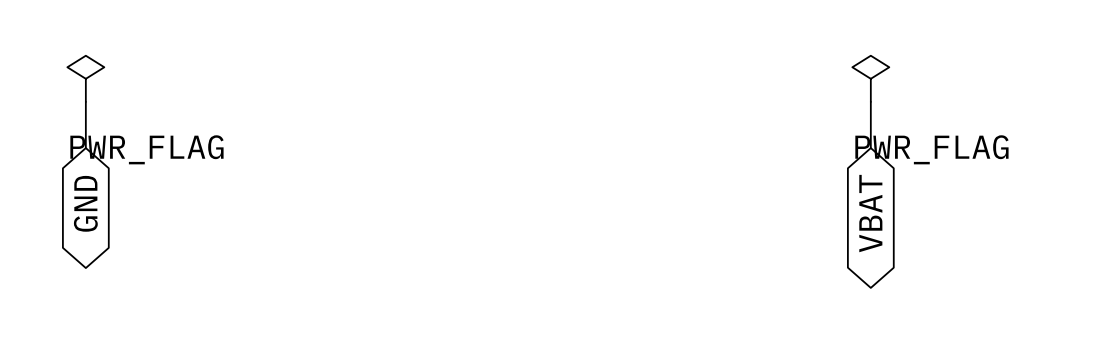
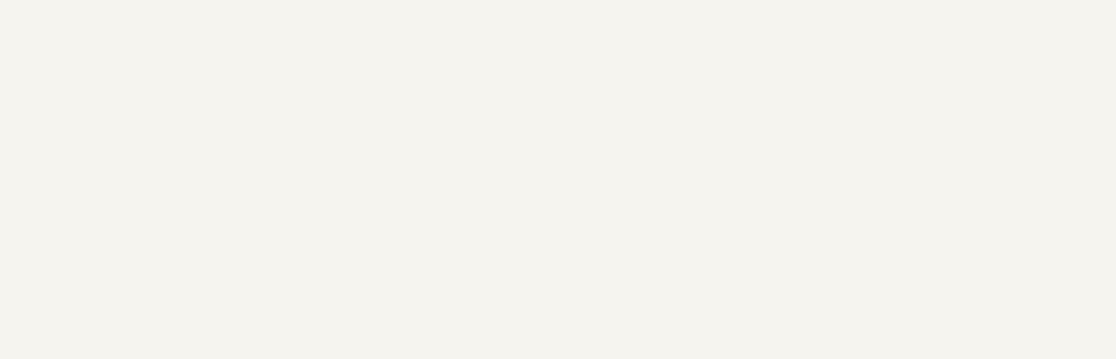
power symbol: PWR_FLAG (85, 78) -> none
power symbol: PWR_FLAG (870, 78) -> none
wire: (85, 101) (85, 148) -> none
wire: (870, 101) (870, 148) -> none
global label: GND (85, 203) -> none
global label: VBAT (870, 213) -> none

